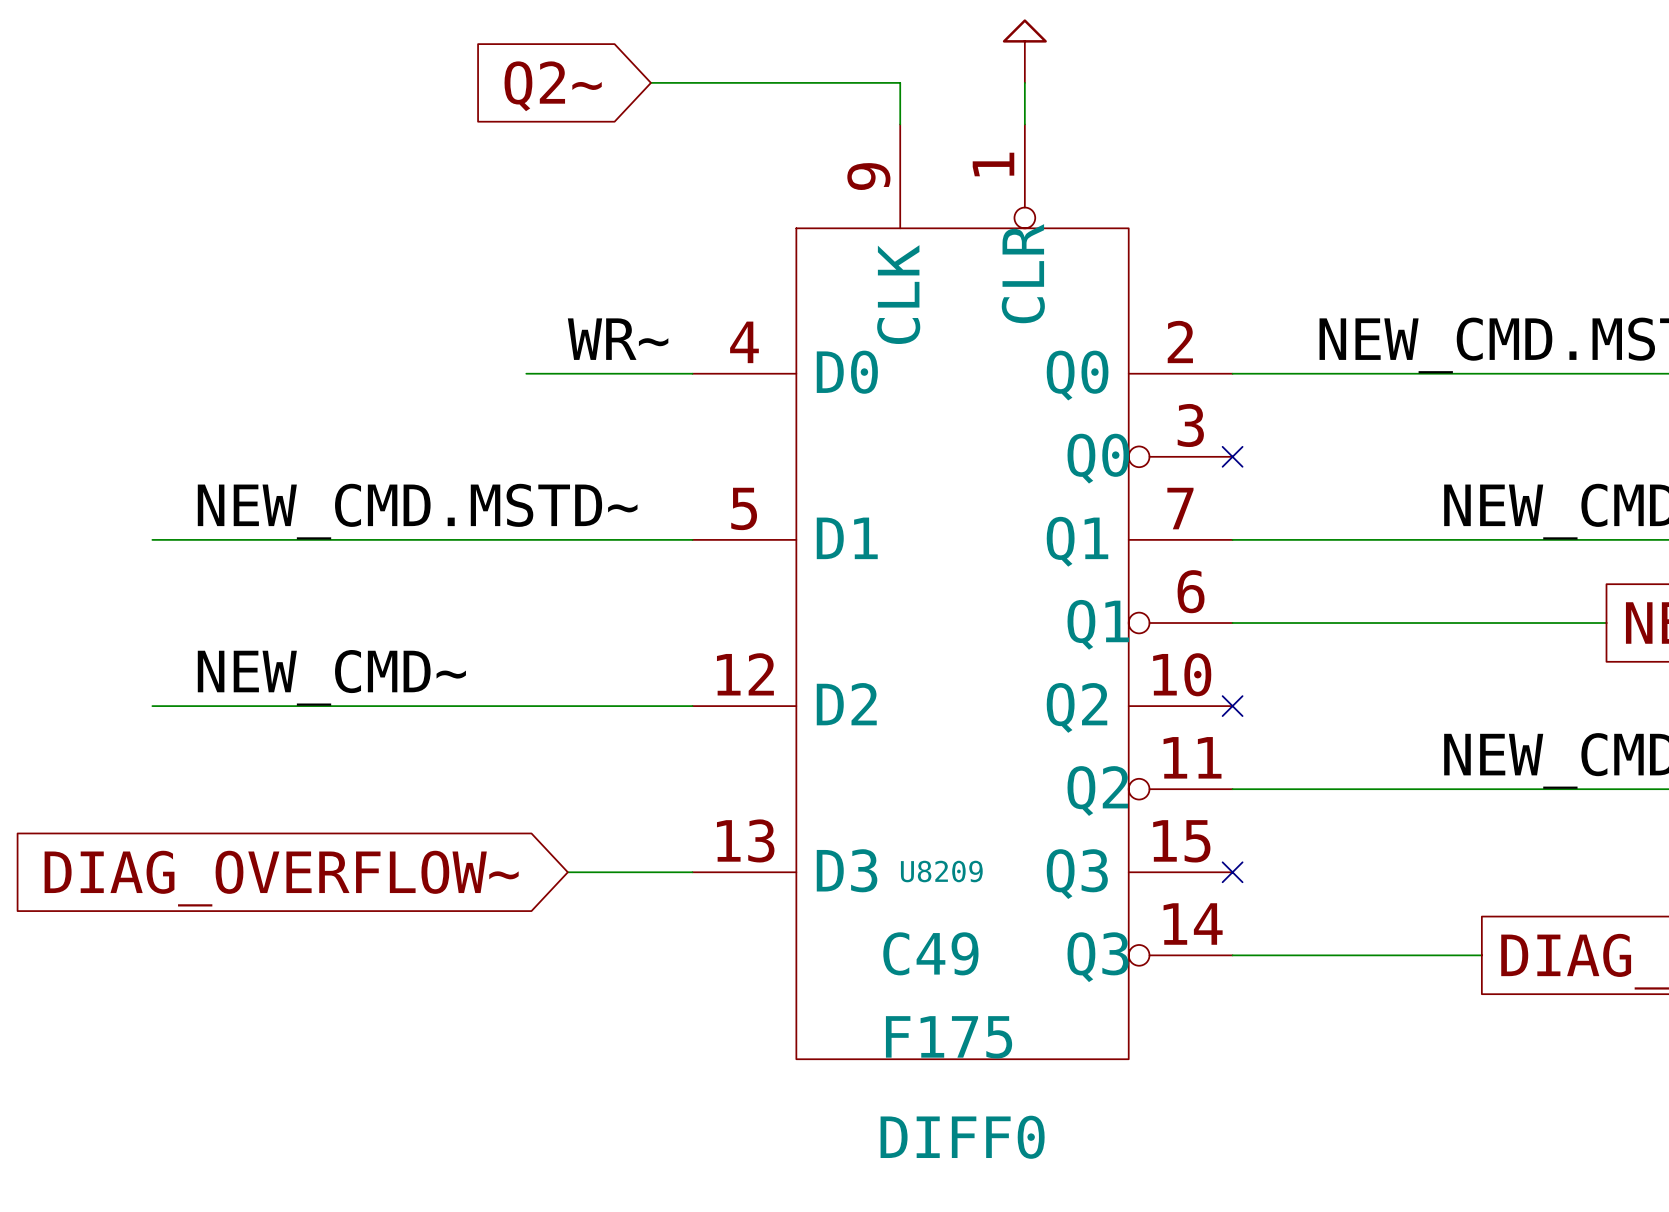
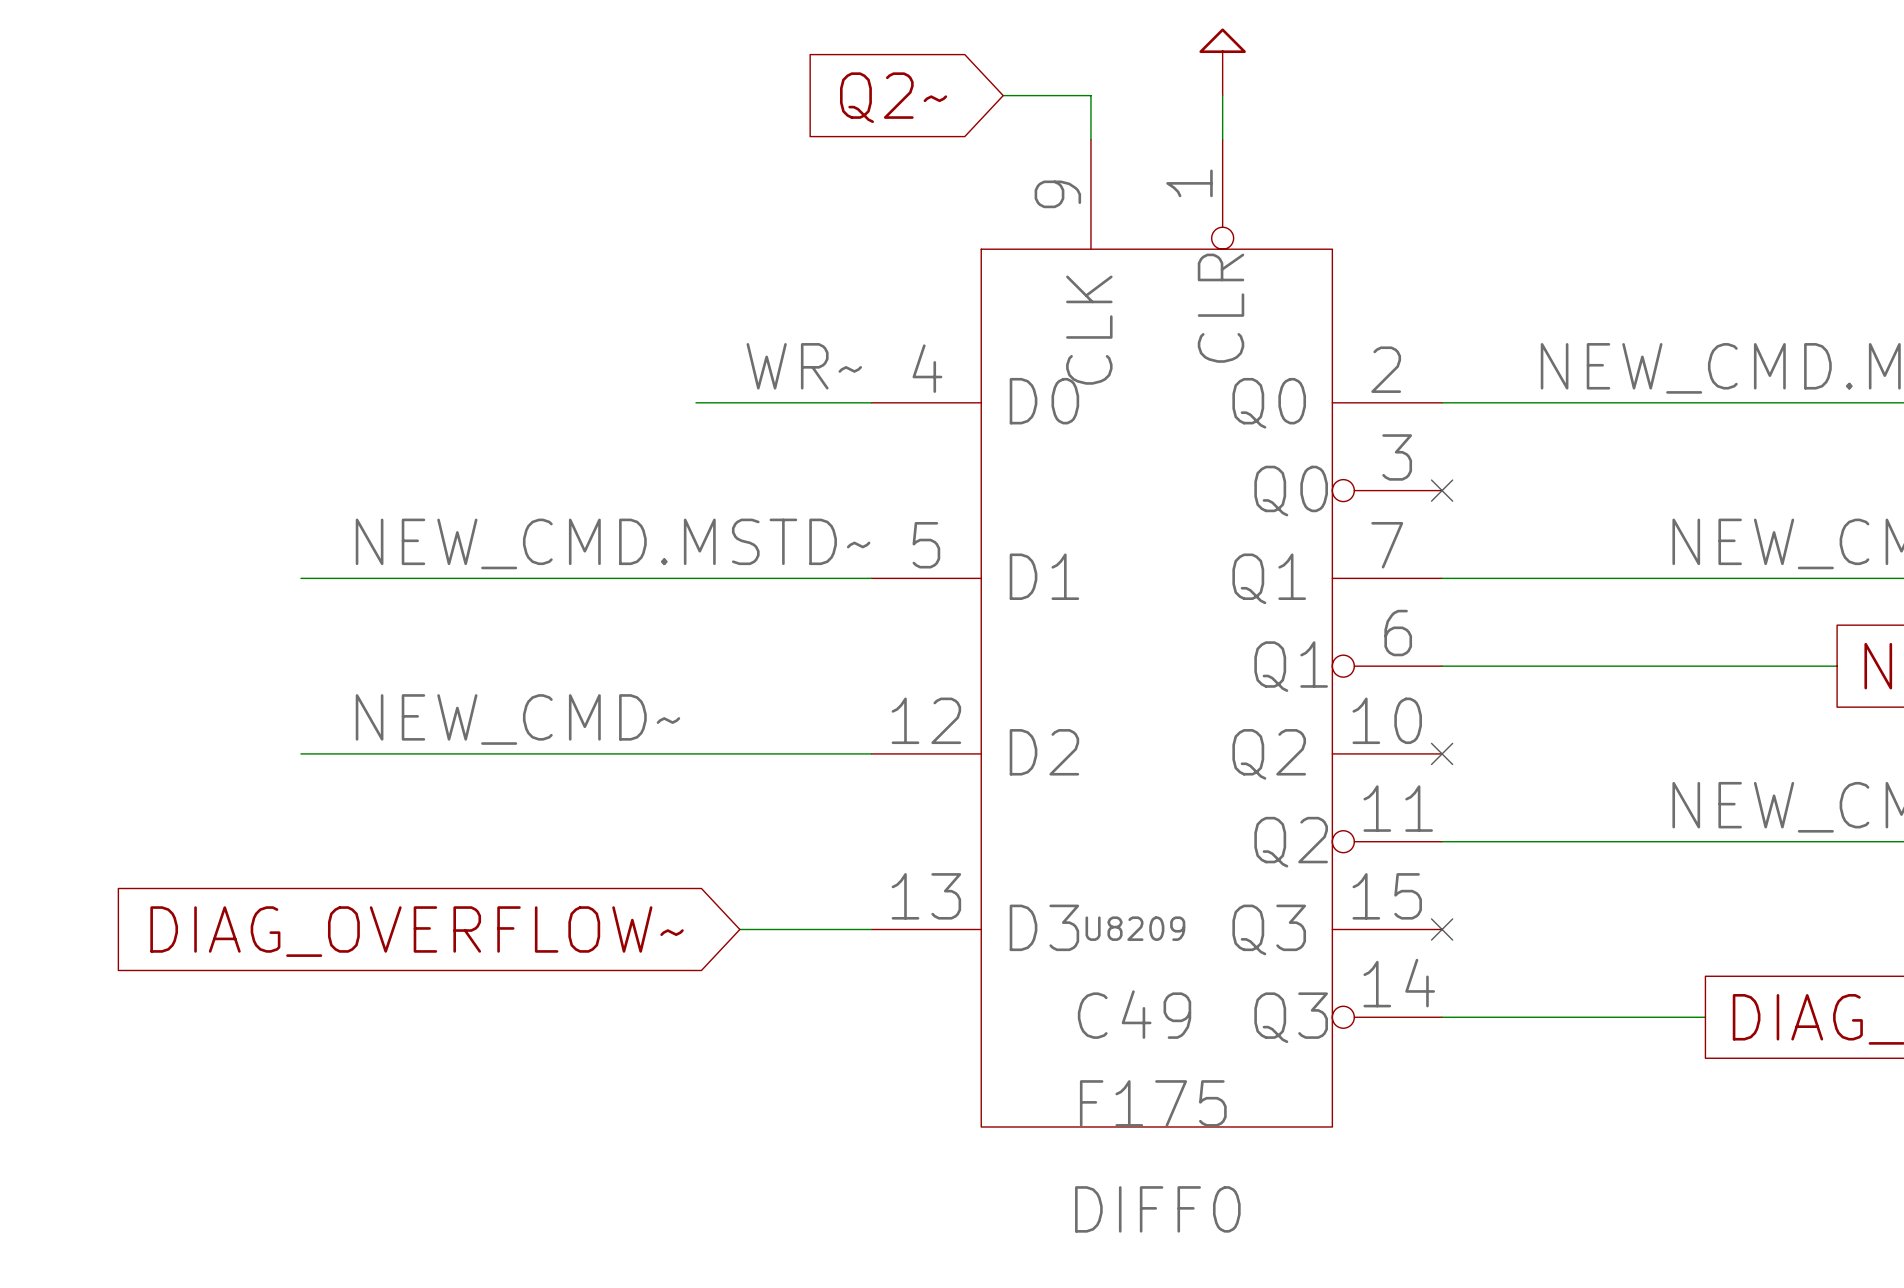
wire: (650, 82) (817, 82) -> none
global label position: Q2~ (553, 86) -> Q2~ (893, 97)

